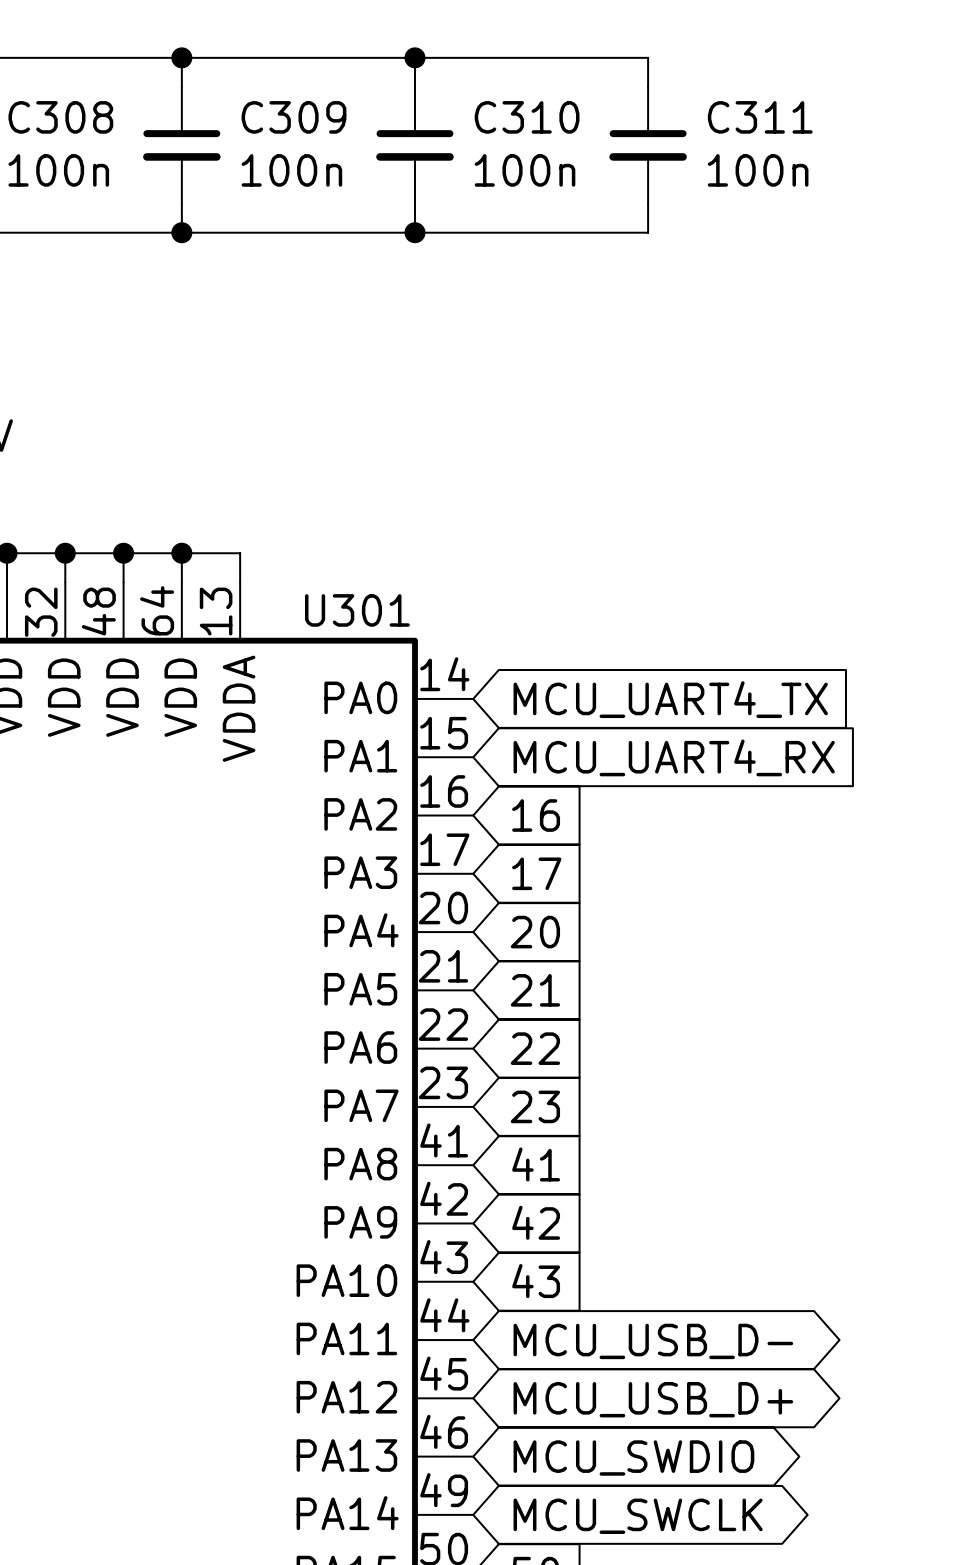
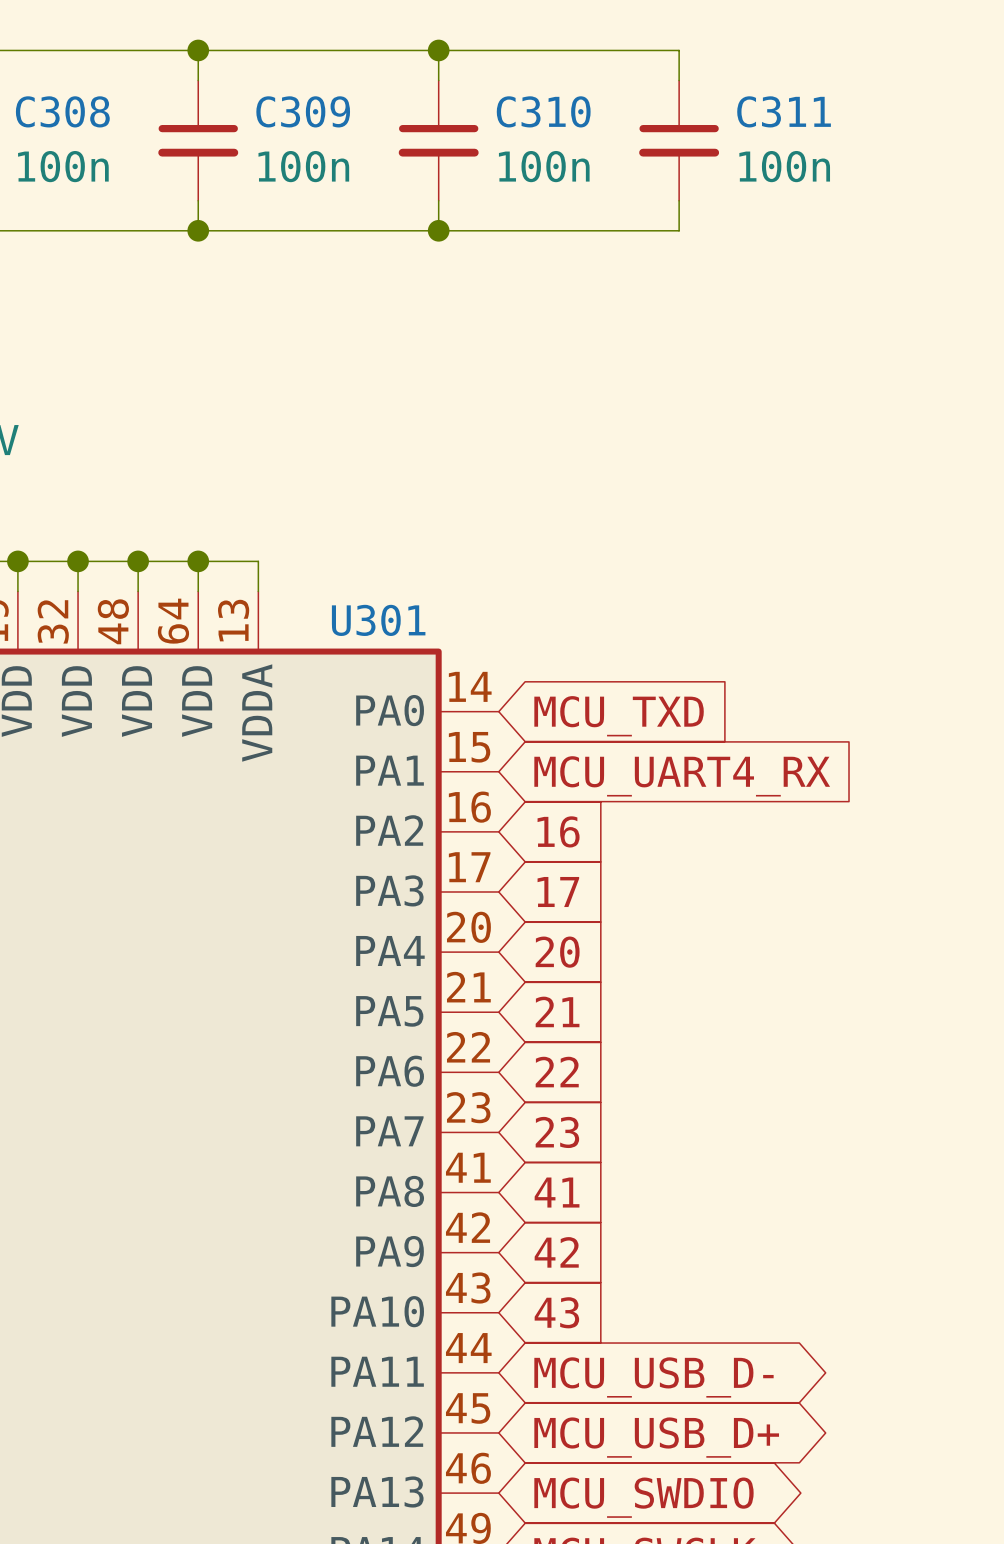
global label: MCU_UART4_TX (670, 699) -> MCU_TXD (619, 716)

